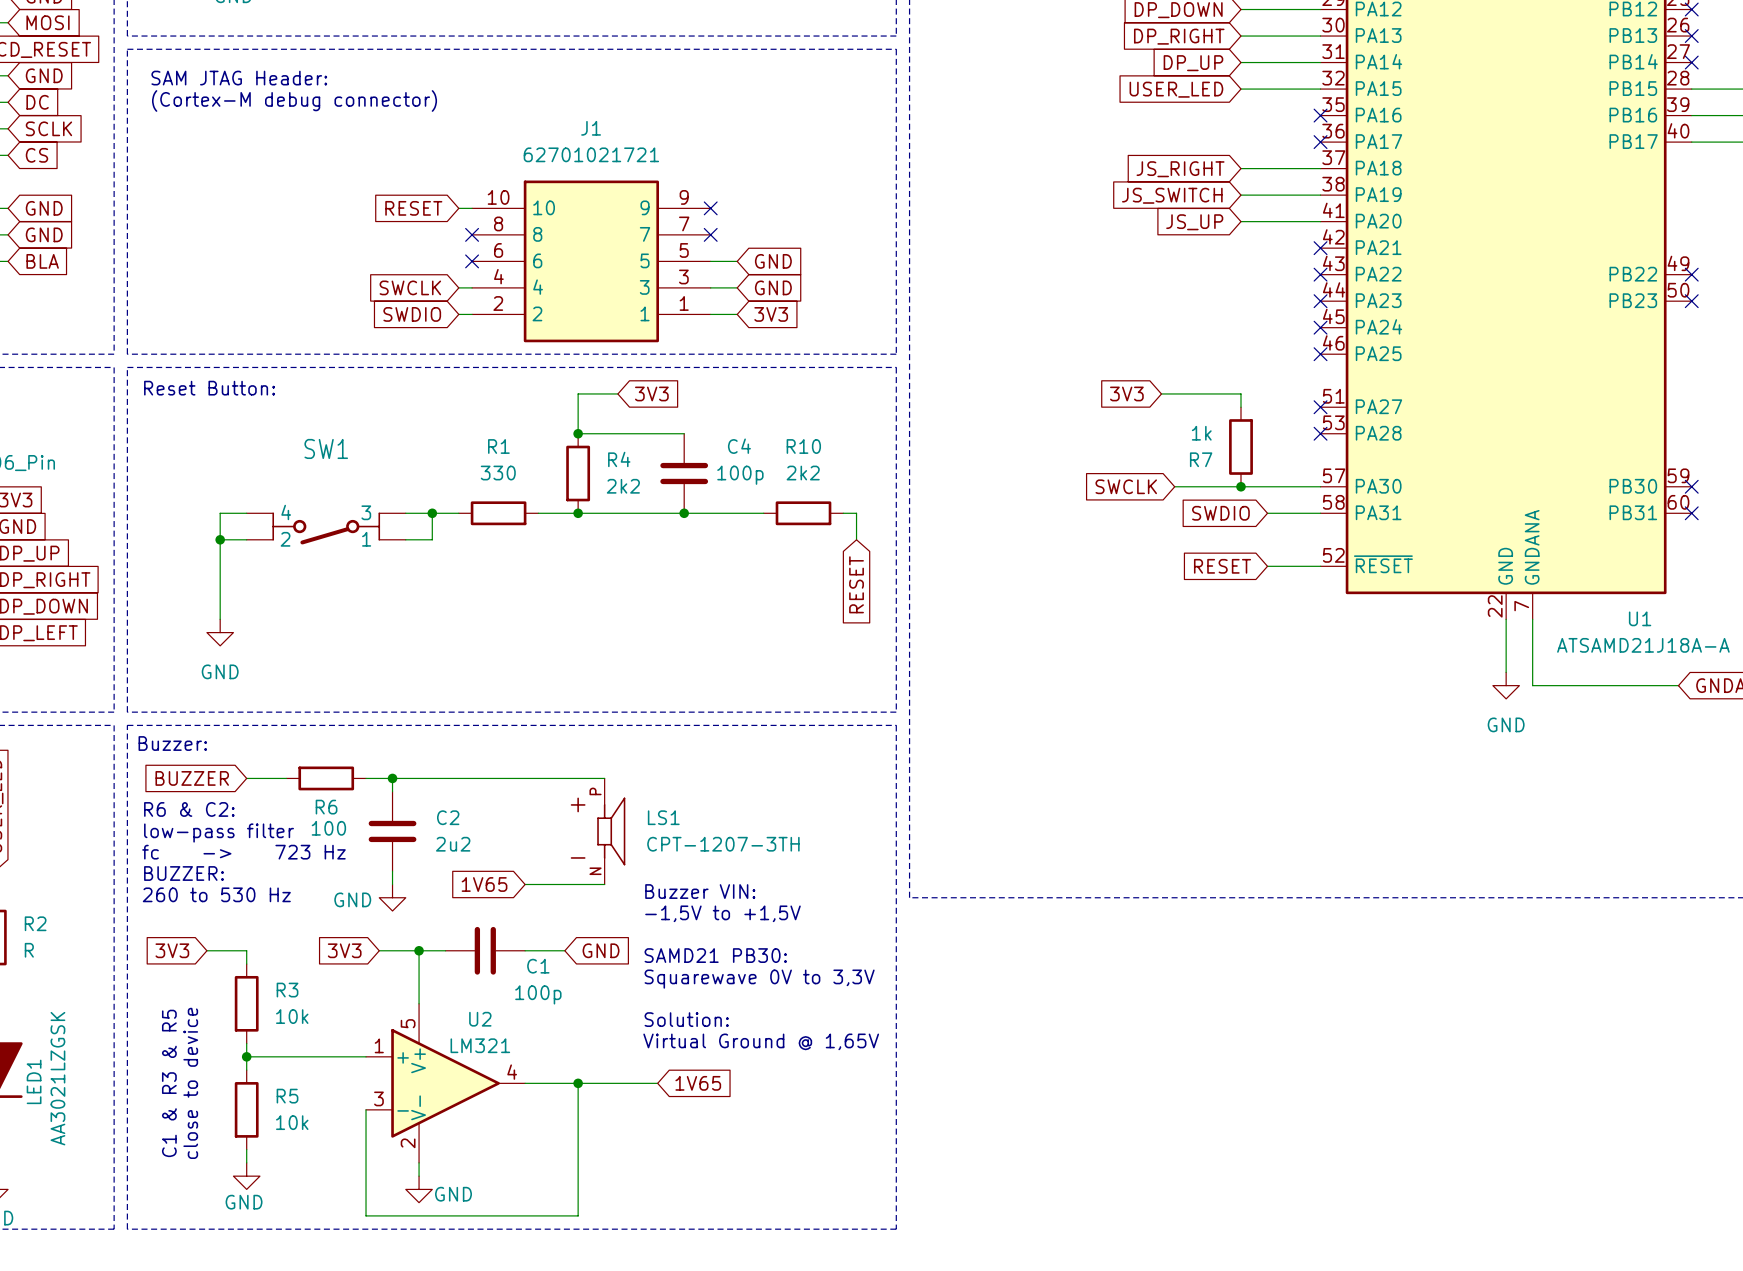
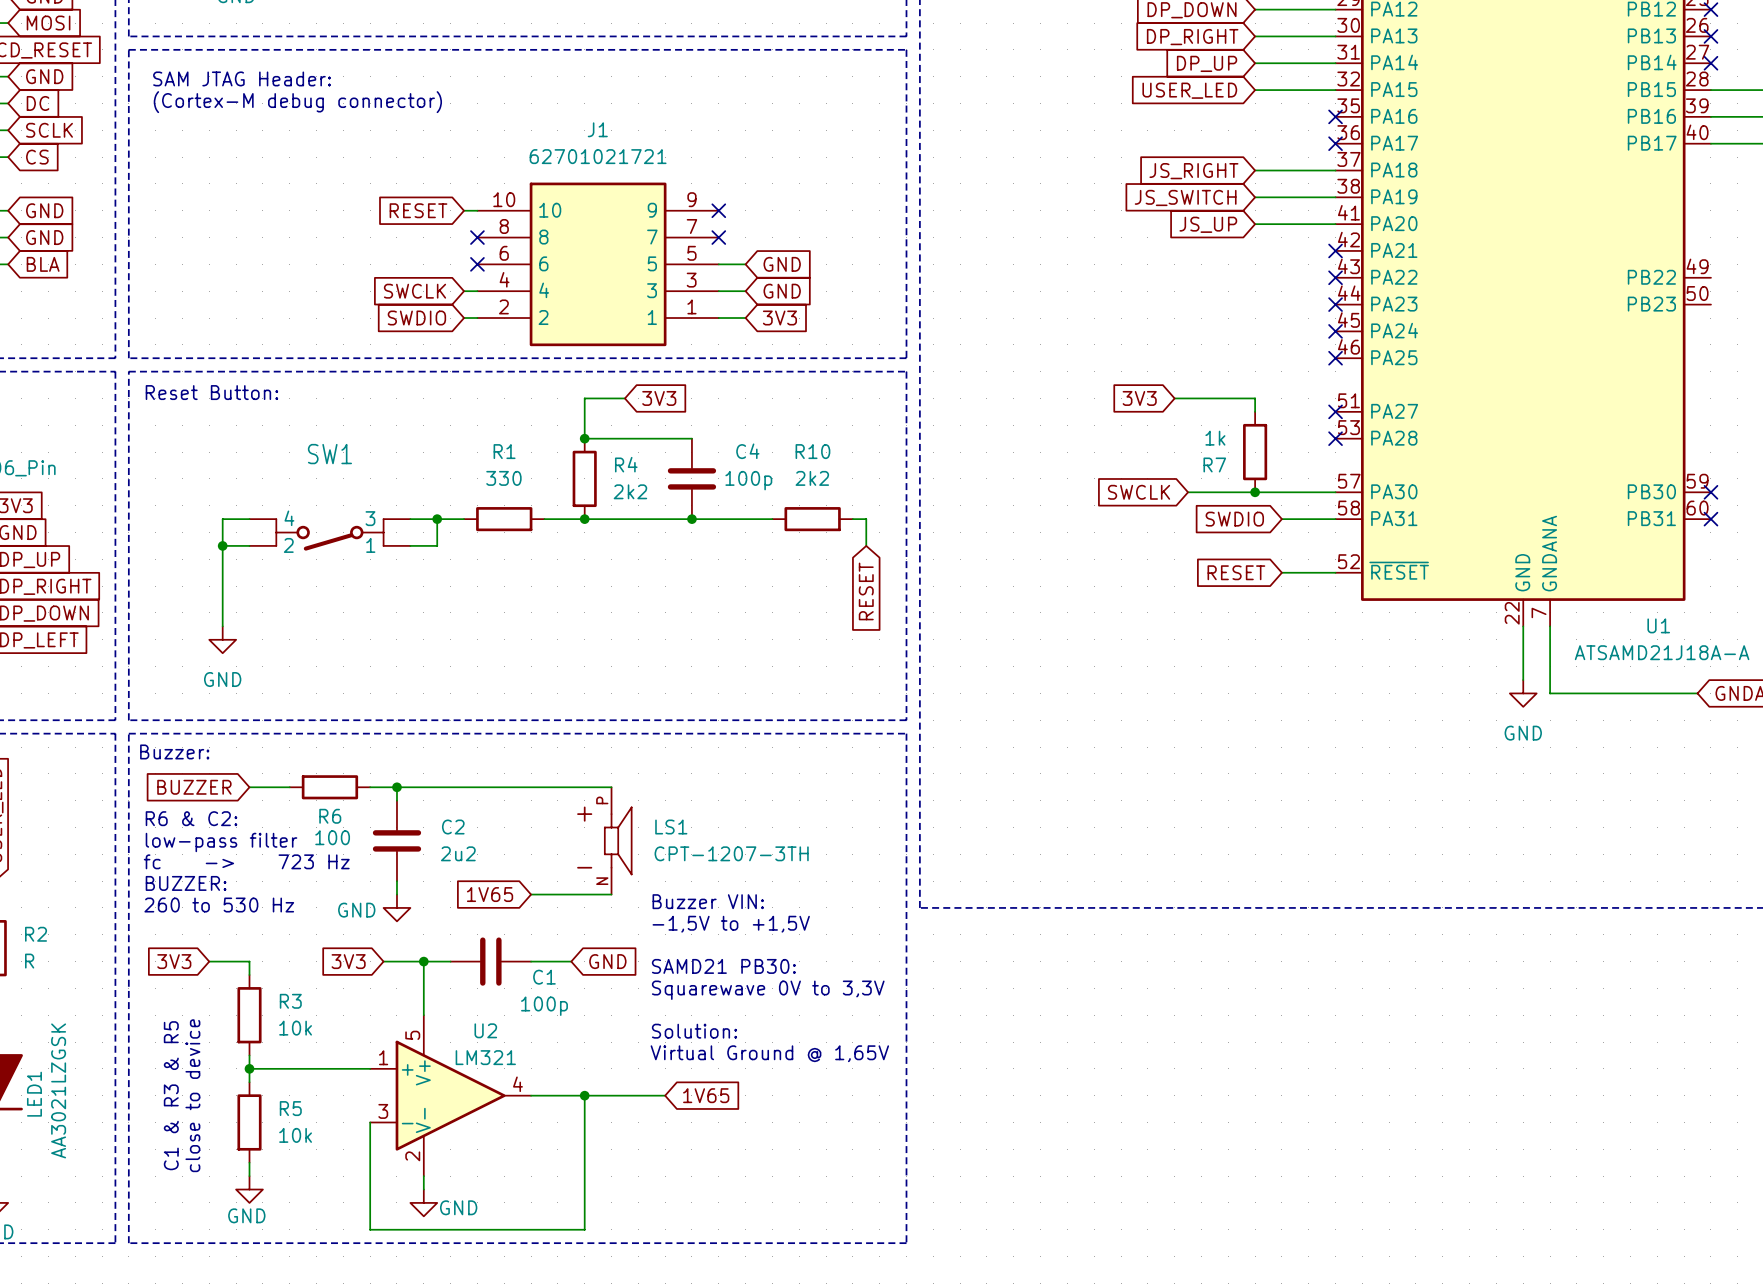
no-connect mark: (1691, 274) -> none
no-connect mark: (1691, 301) -> none

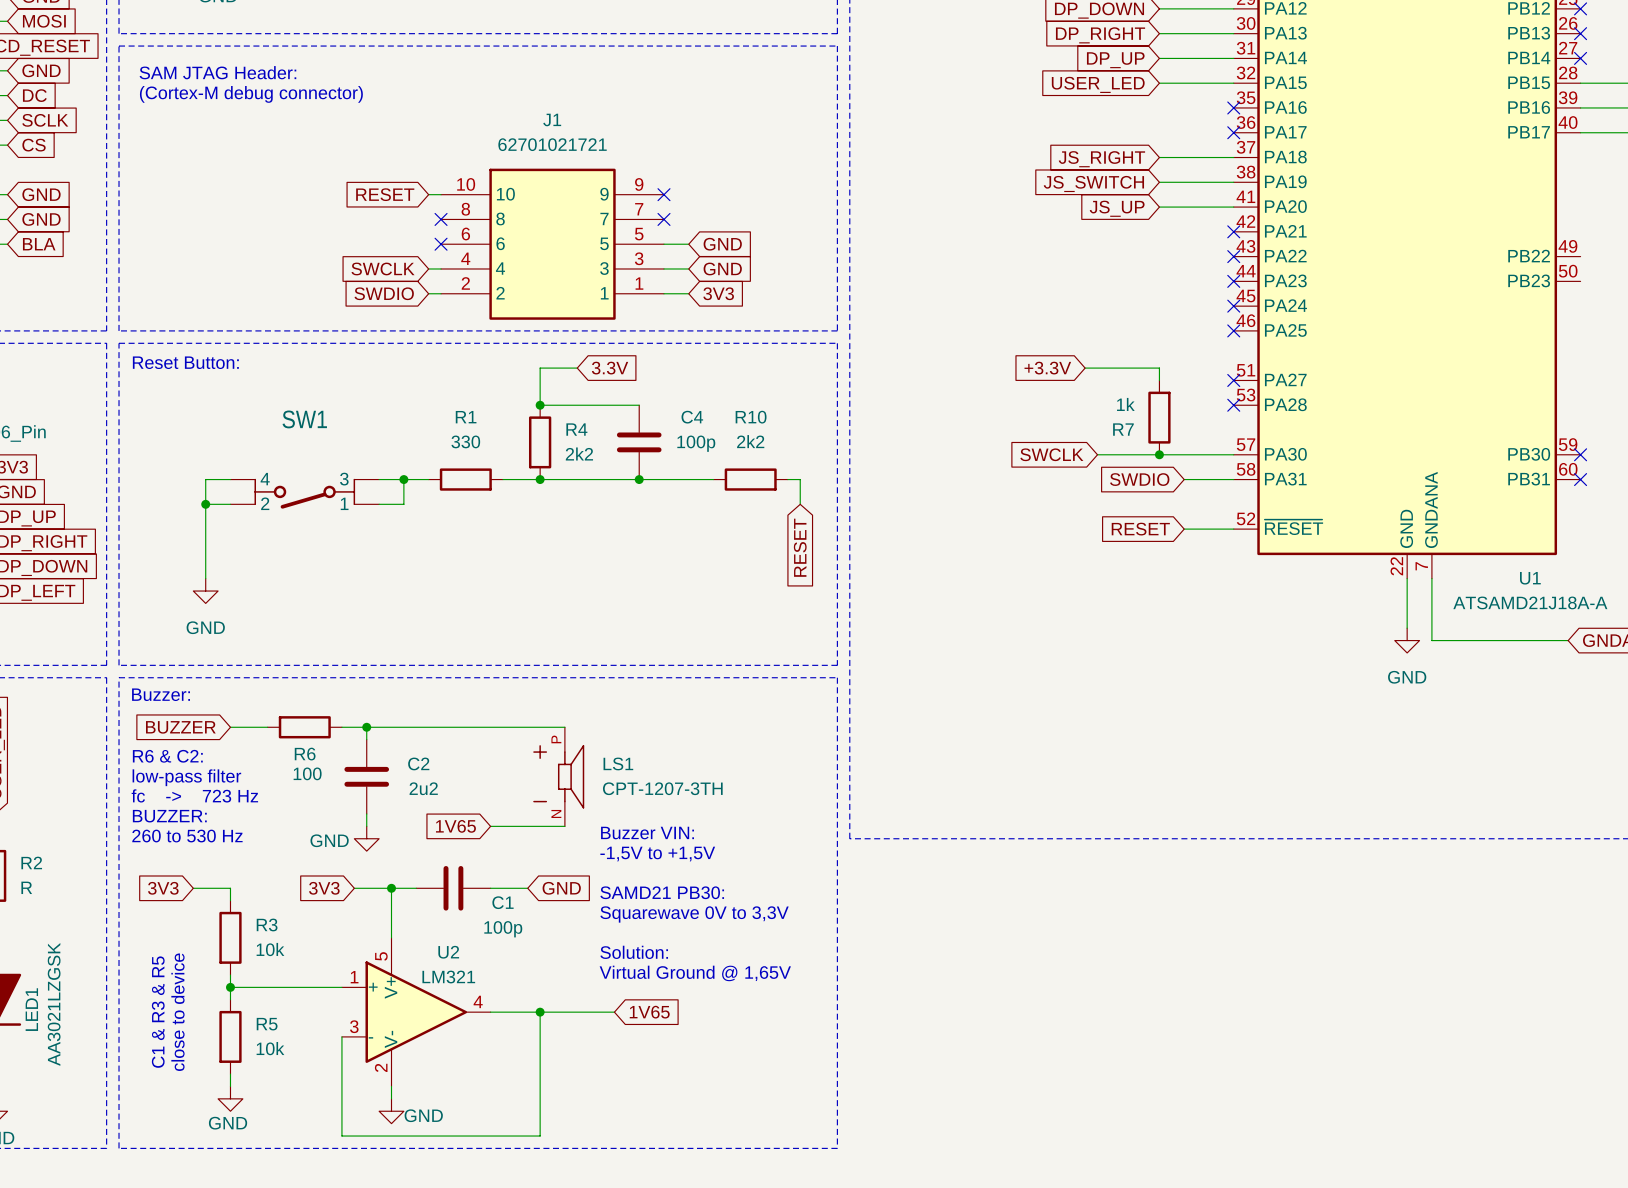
global label: 3V3 (659, 398) -> 3.3V (610, 368)
global label: 3V3 (1139, 398) -> +3.3V (1047, 368)

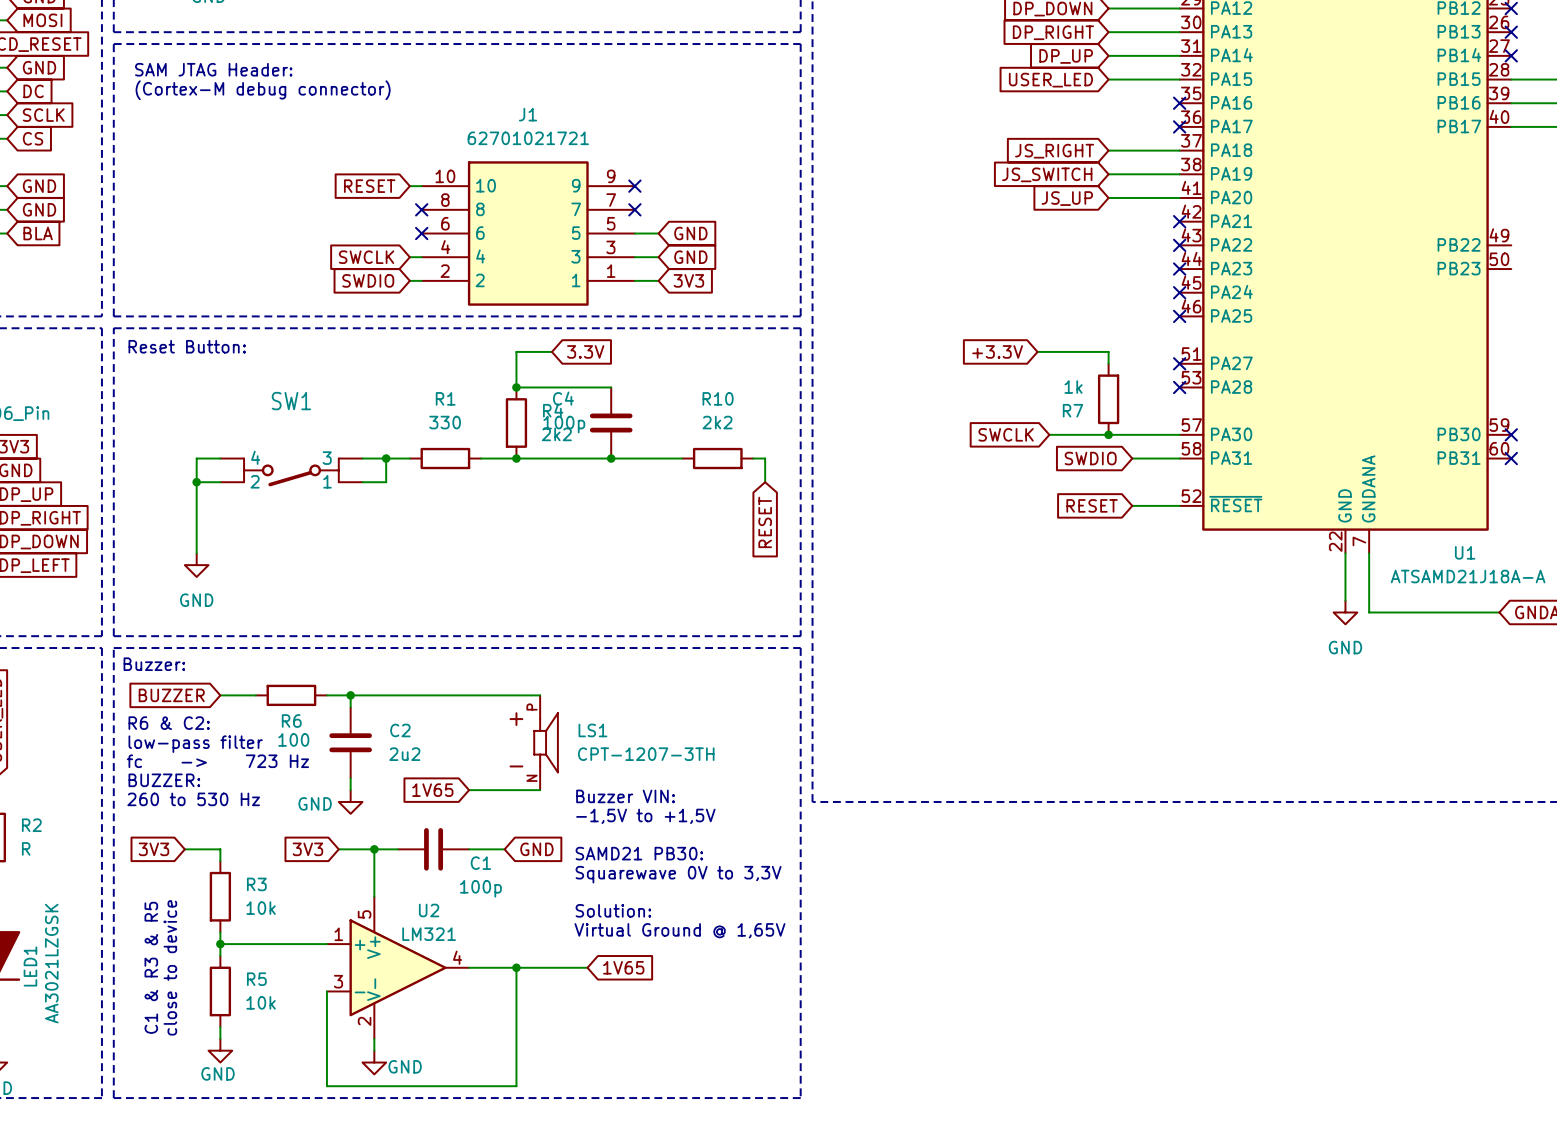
C4 name position: C4 (692, 417) -> C4 (563, 398)
C4 value position: 100p (696, 443) -> 100p (564, 424)

